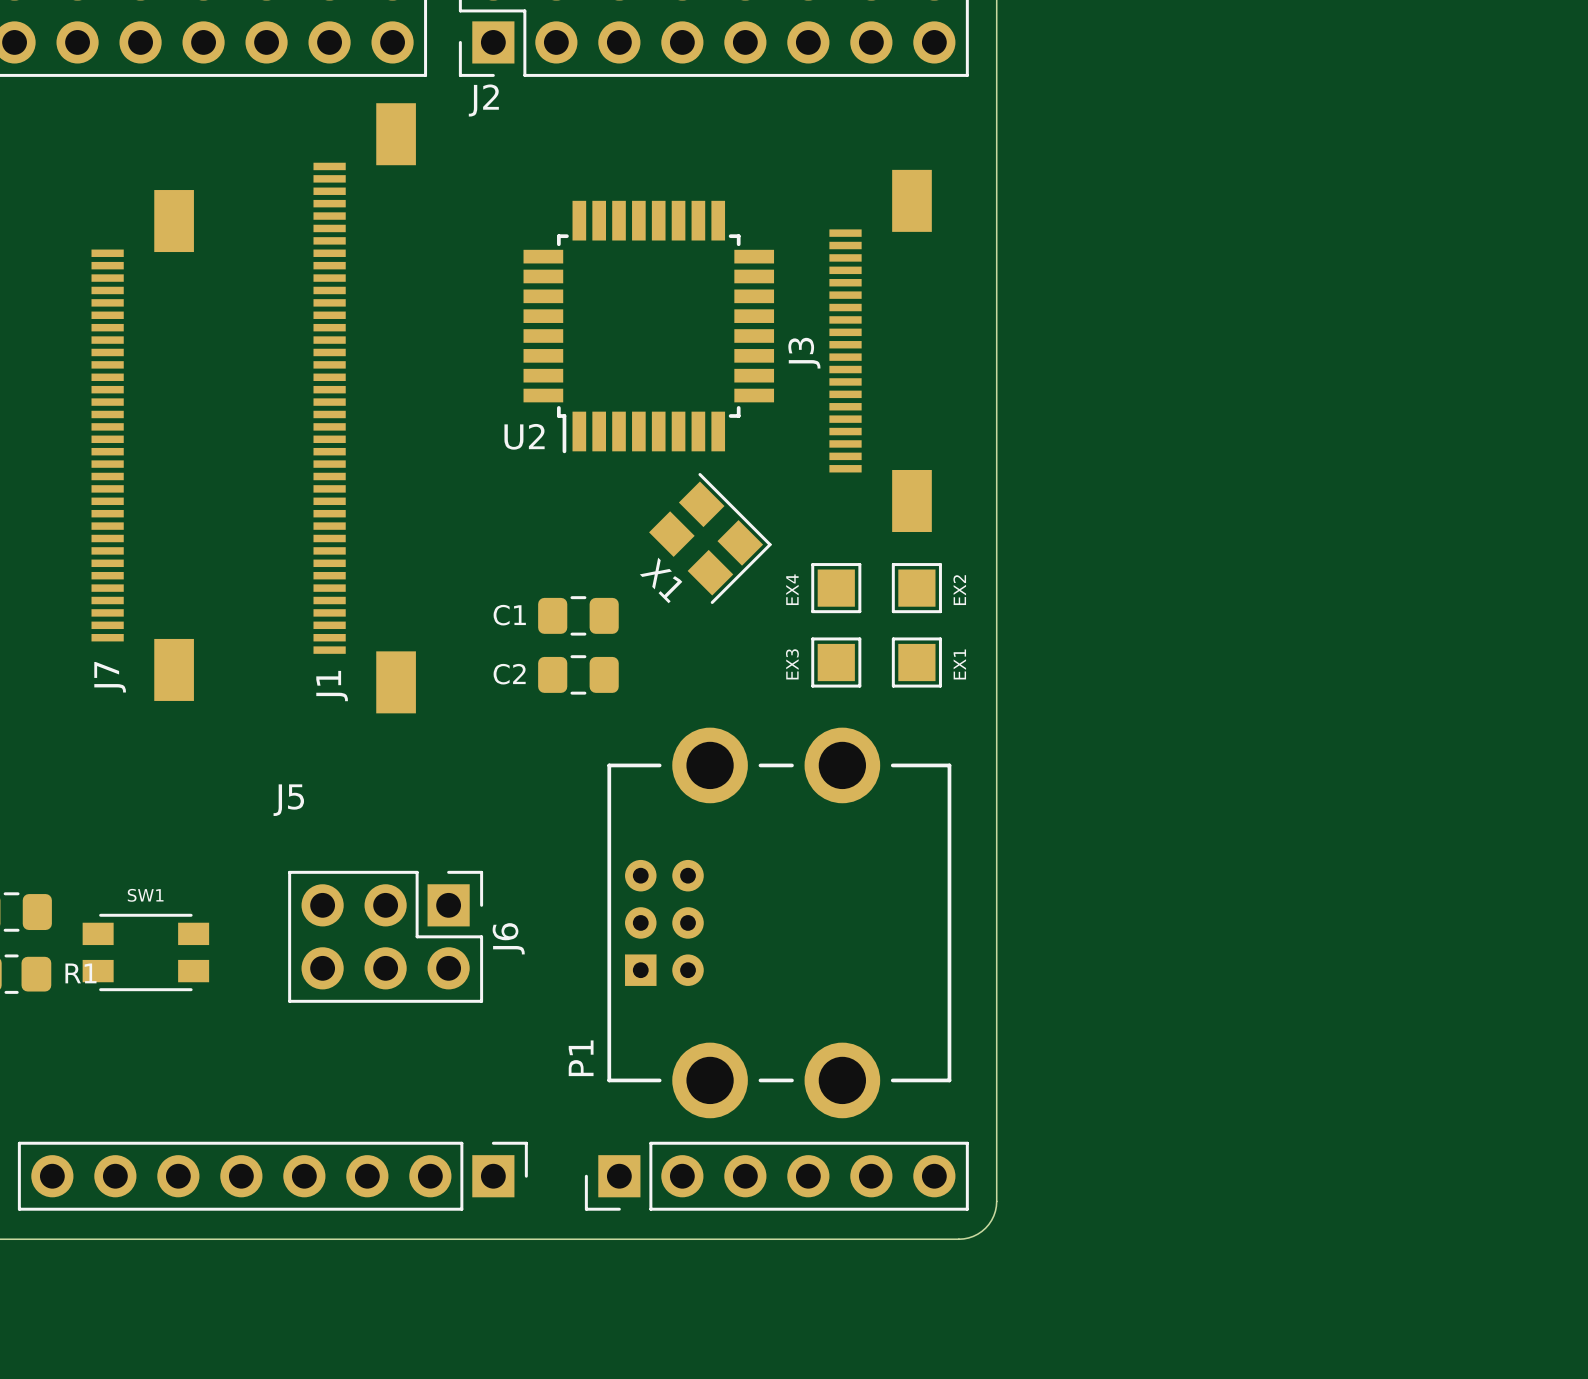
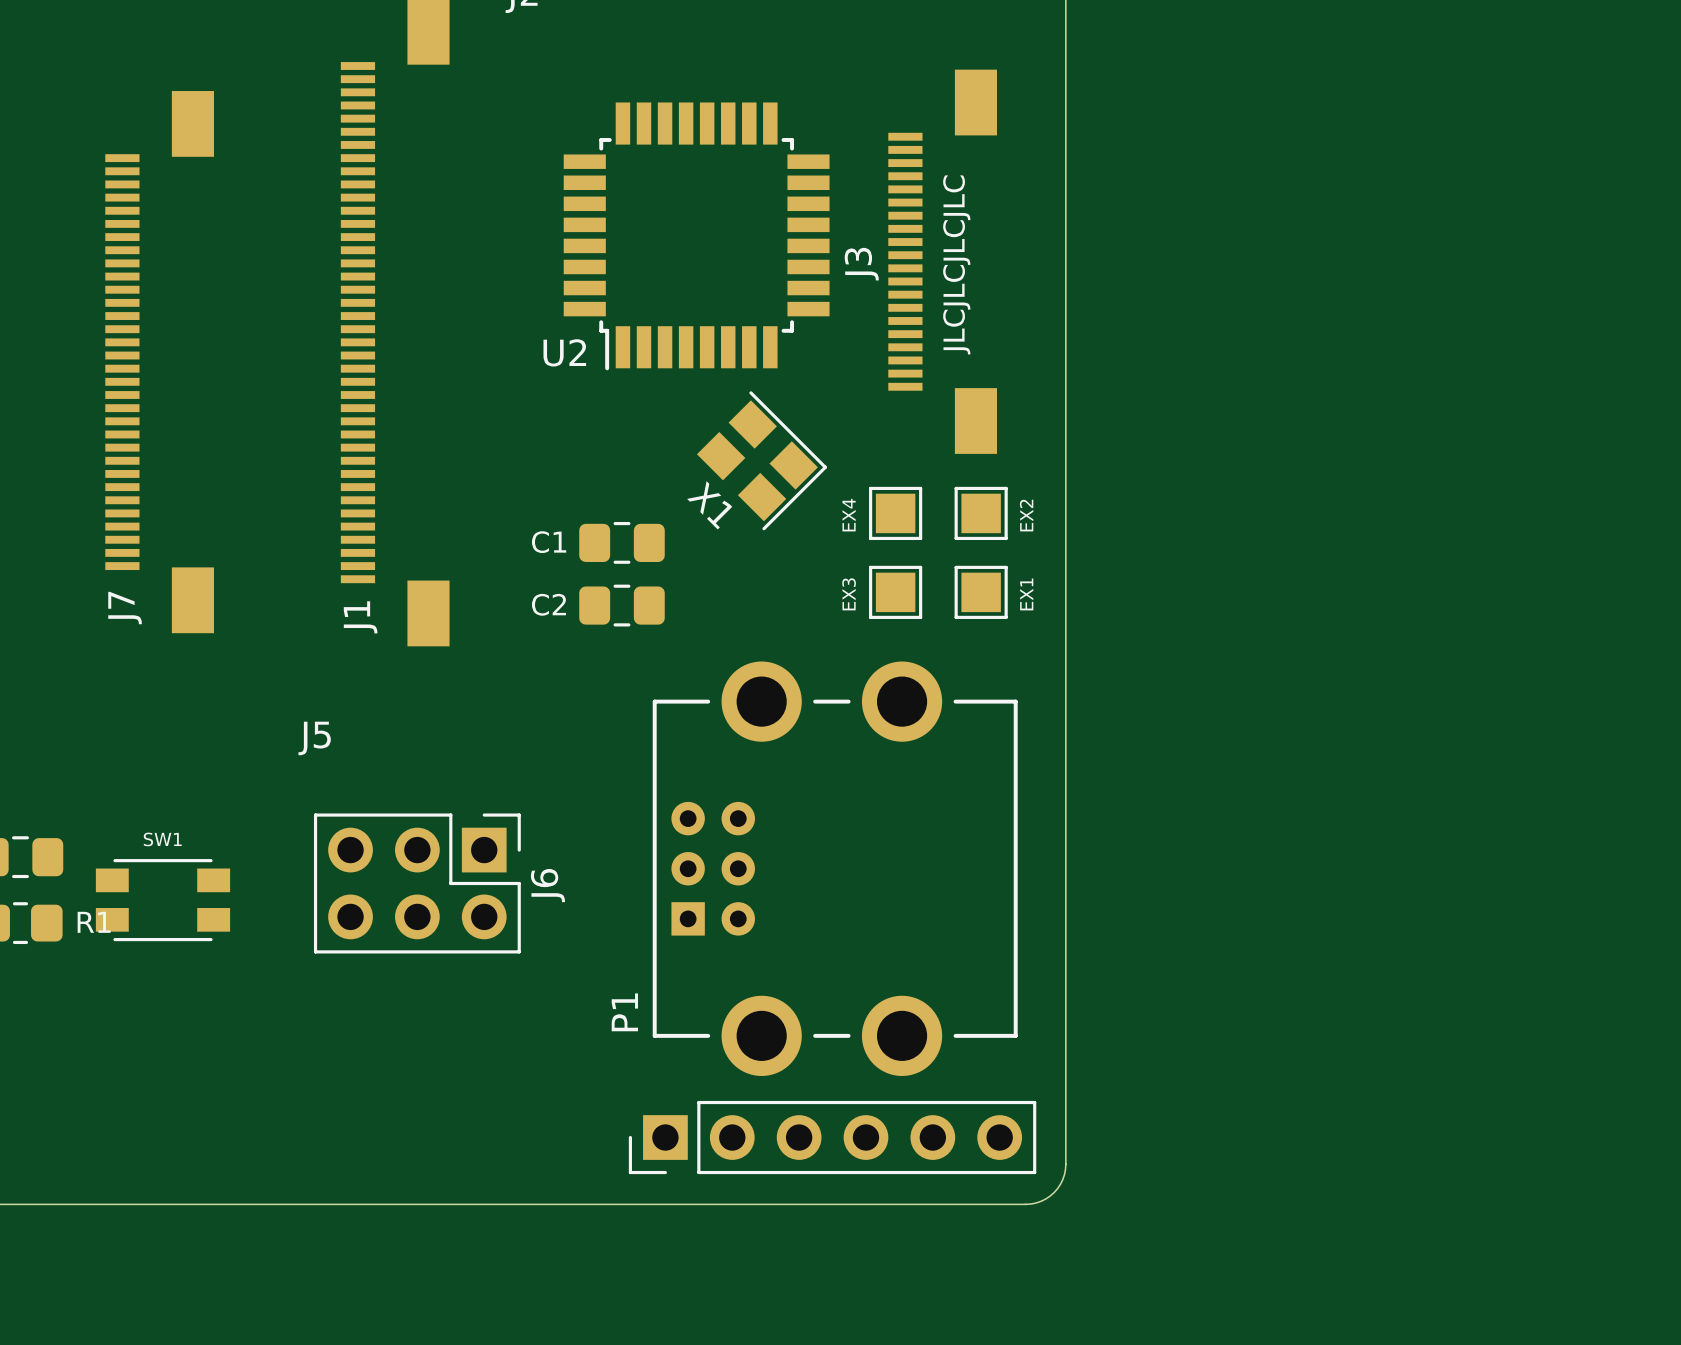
text: none -> JLCJLCJLCJLC (956, 264)
part: (272, 1176) -> none

